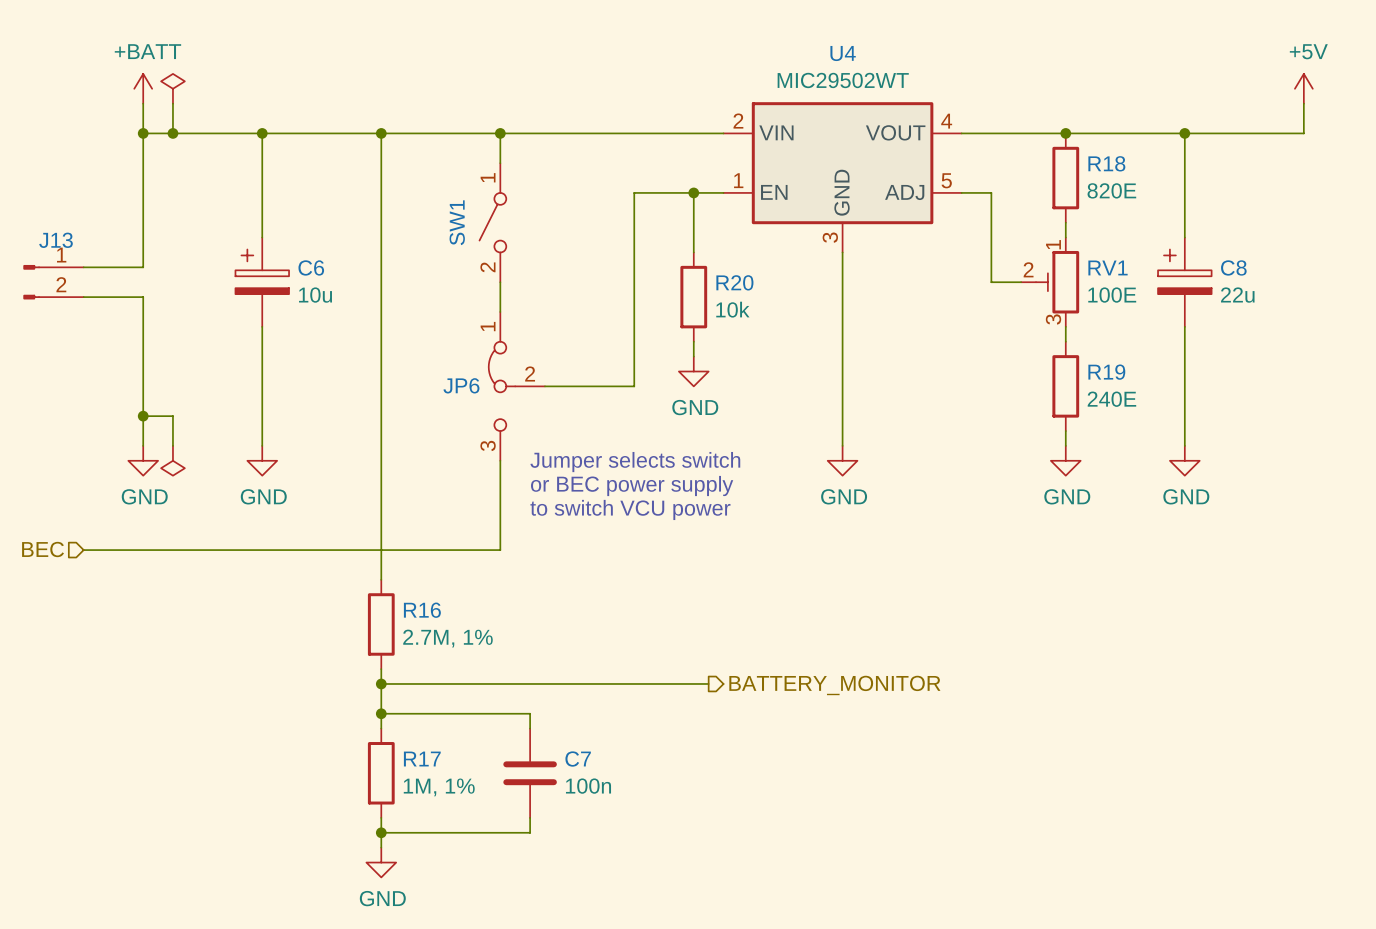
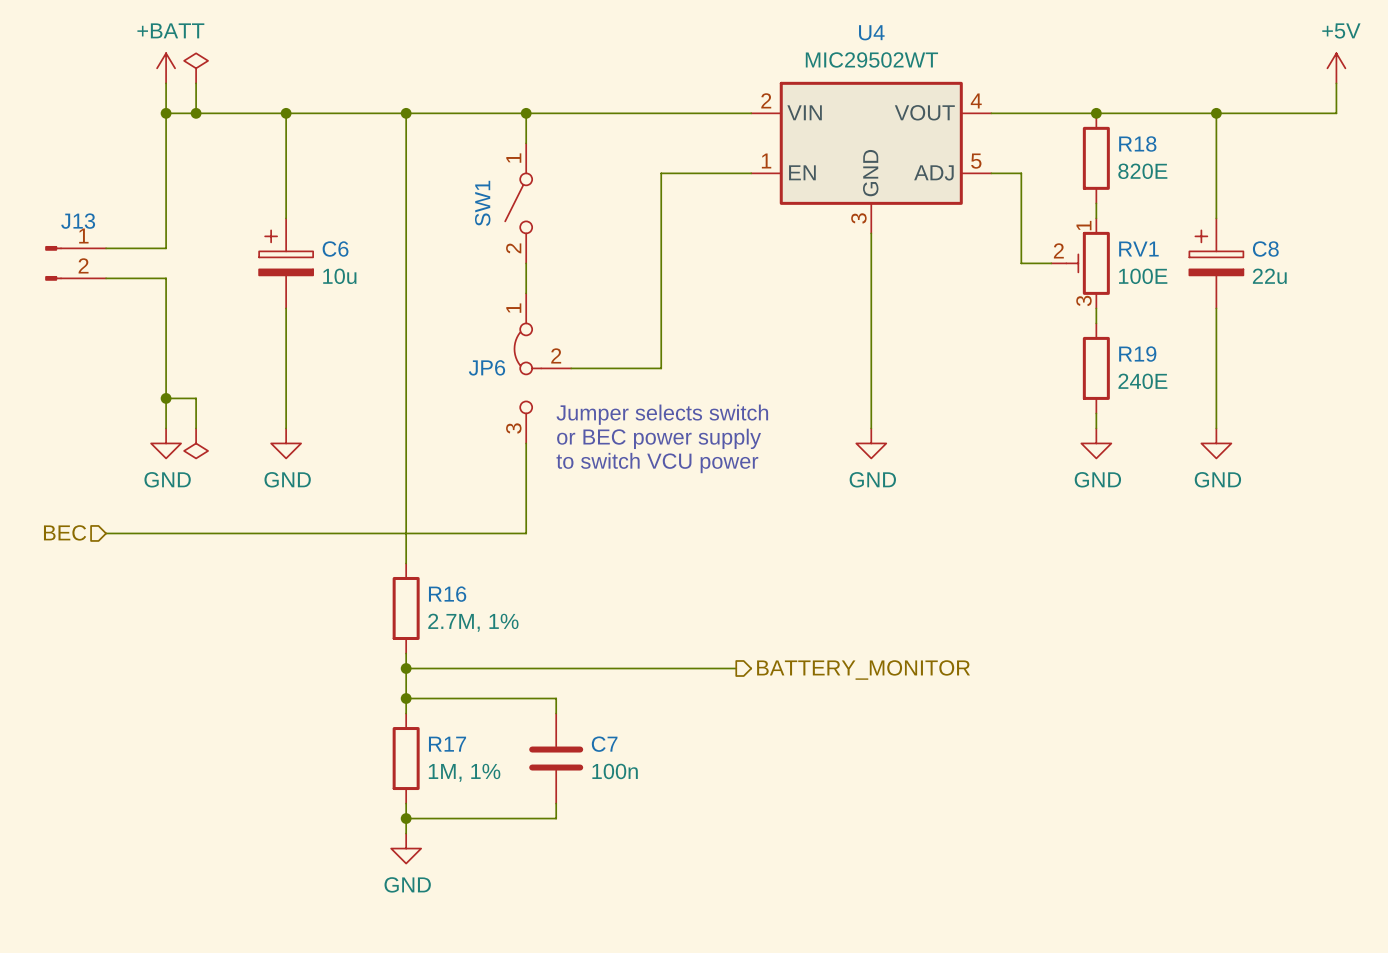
wire: (693, 192) (693, 252) -> none
junction: (693, 192) -> none
R20: 10k (693, 297) -> none
wire: (693, 341) (693, 356) -> none
power symbol: GND (693, 371) -> none
text: none -> Jumper selects switch (662, 414)
text: Jumper selects switch (635, 462) -> or BEC power supply (659, 438)
text: or BEC power supply (632, 486) -> to switch VCU power (657, 463)
text: to switch VCU power (630, 509) -> none

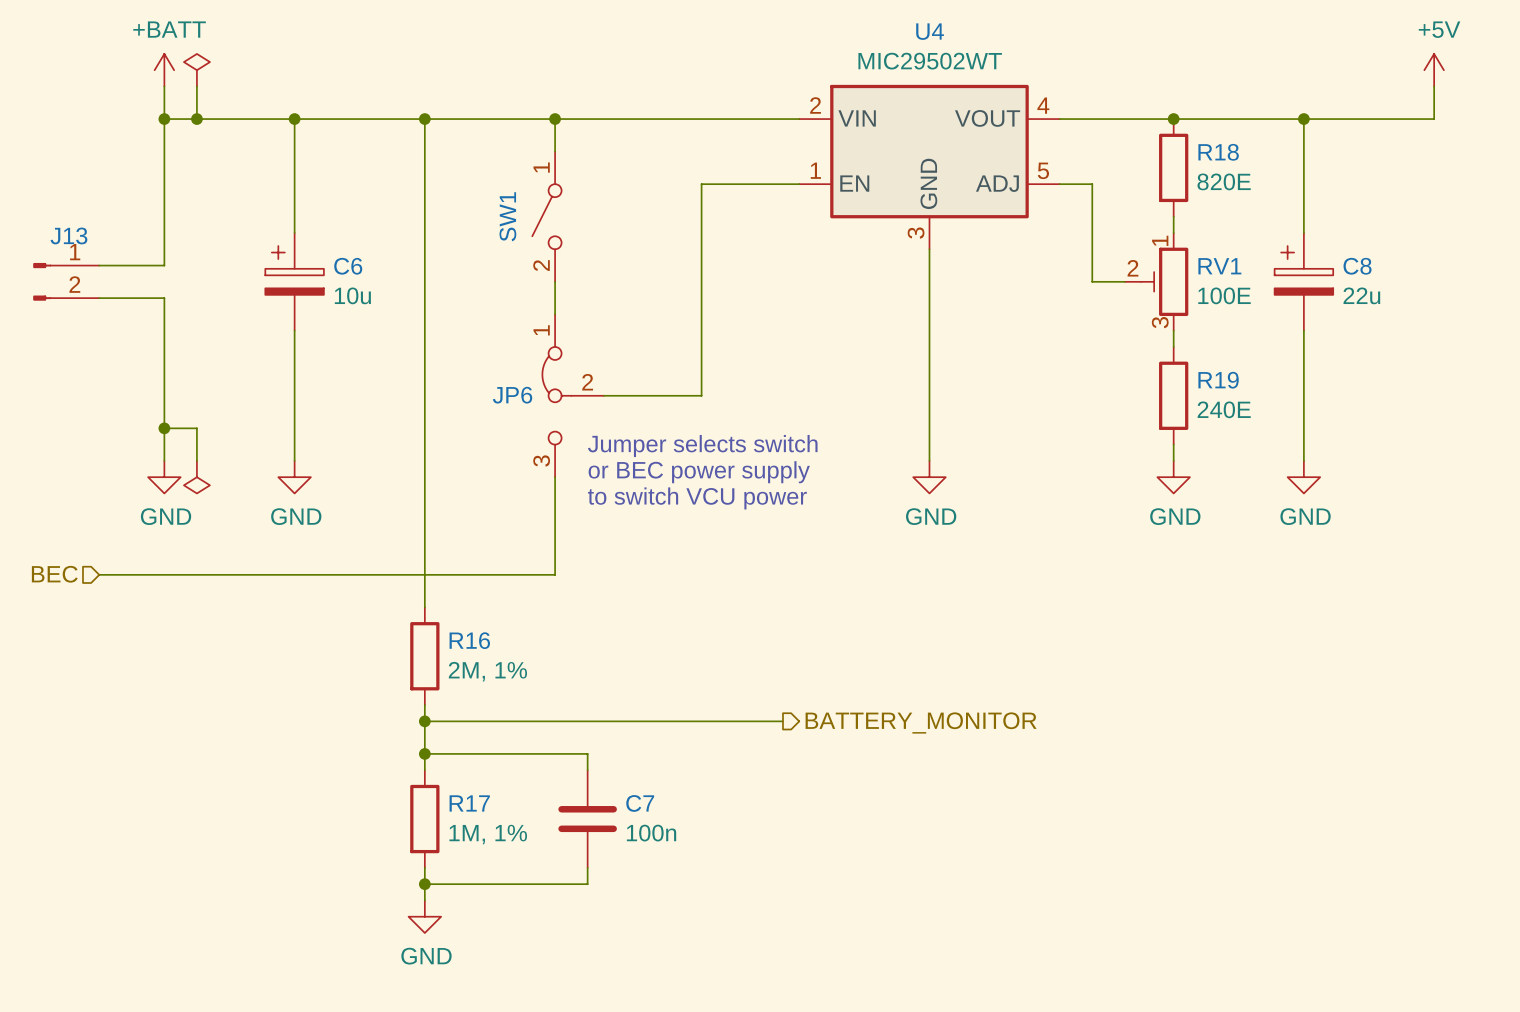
R16 value: 2.7M, 1% (473, 622) -> 2M, 1% (487, 671)

